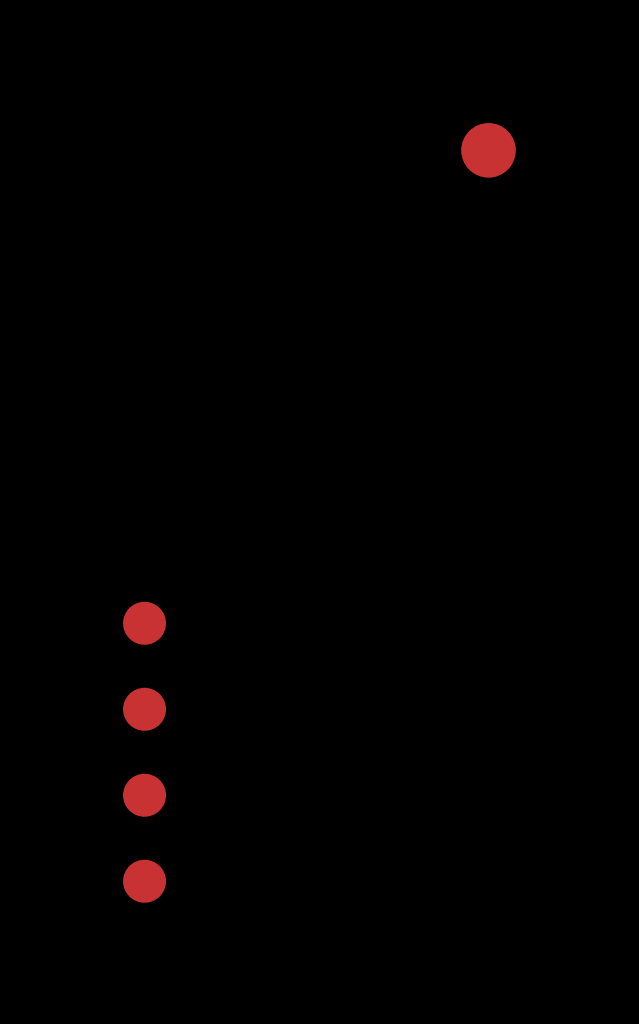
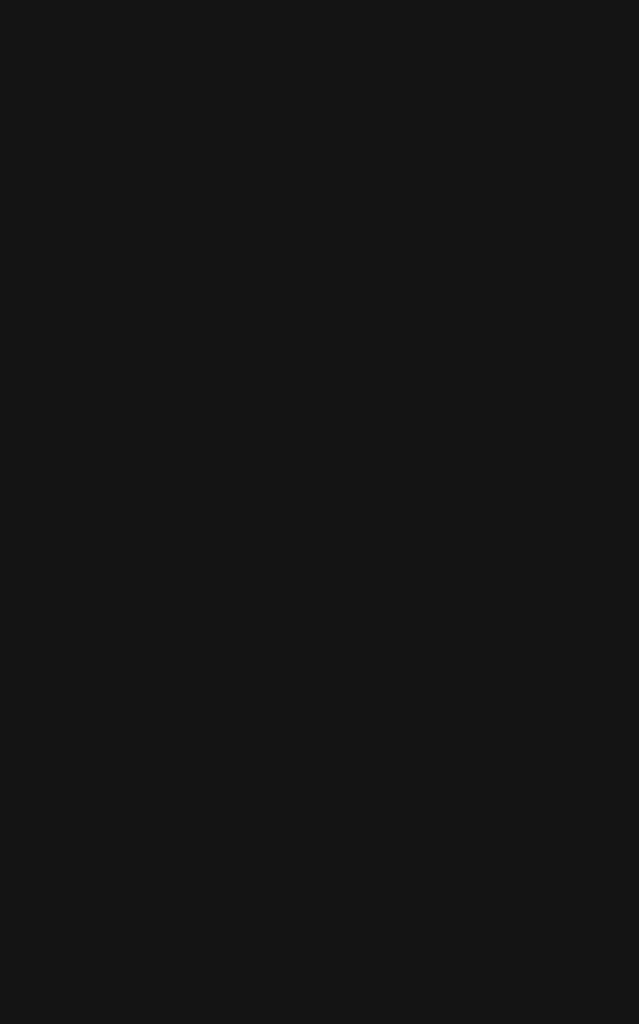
part: (488, 150) -> none
part: (144, 623) -> none
part: (144, 709) -> none
part: (144, 795) -> none
part: (144, 881) -> none

